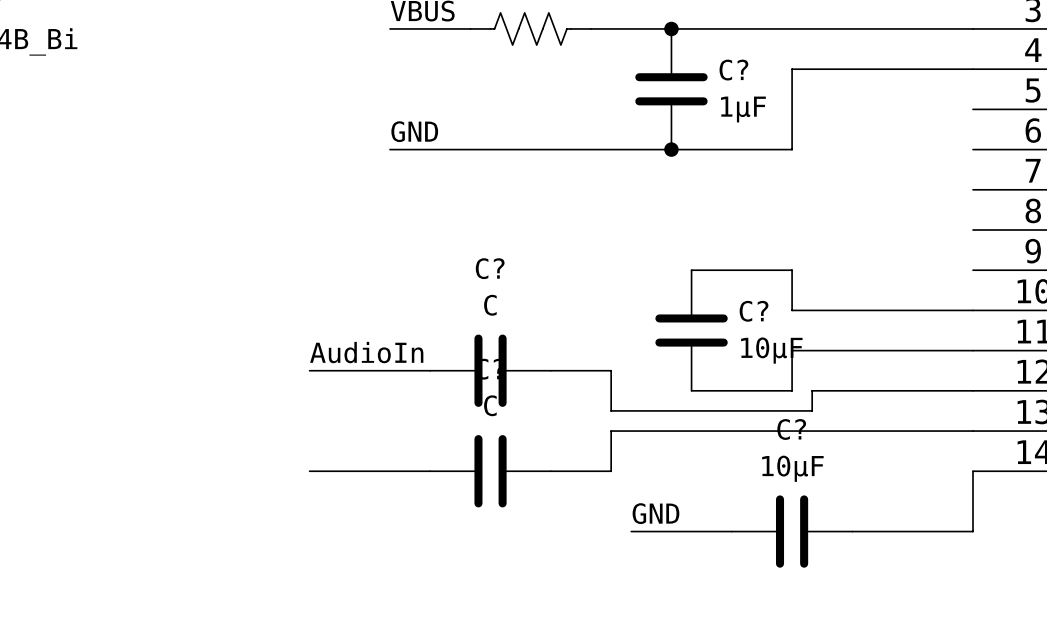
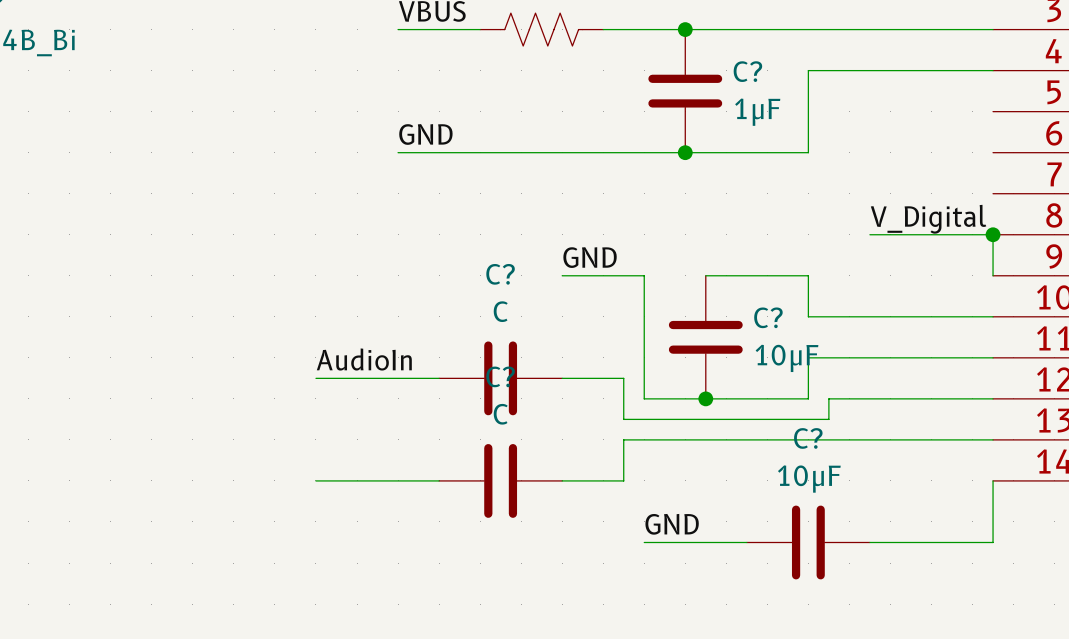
label: none -> V_Digital (928, 219)
wire: none -> (869, 234) (993, 234) (993, 275)
junction: none -> (993, 234)
label: none -> GND (590, 257)
wire: none -> (562, 275) (644, 275) (644, 398) (705, 398)
junction: none -> (705, 398)

